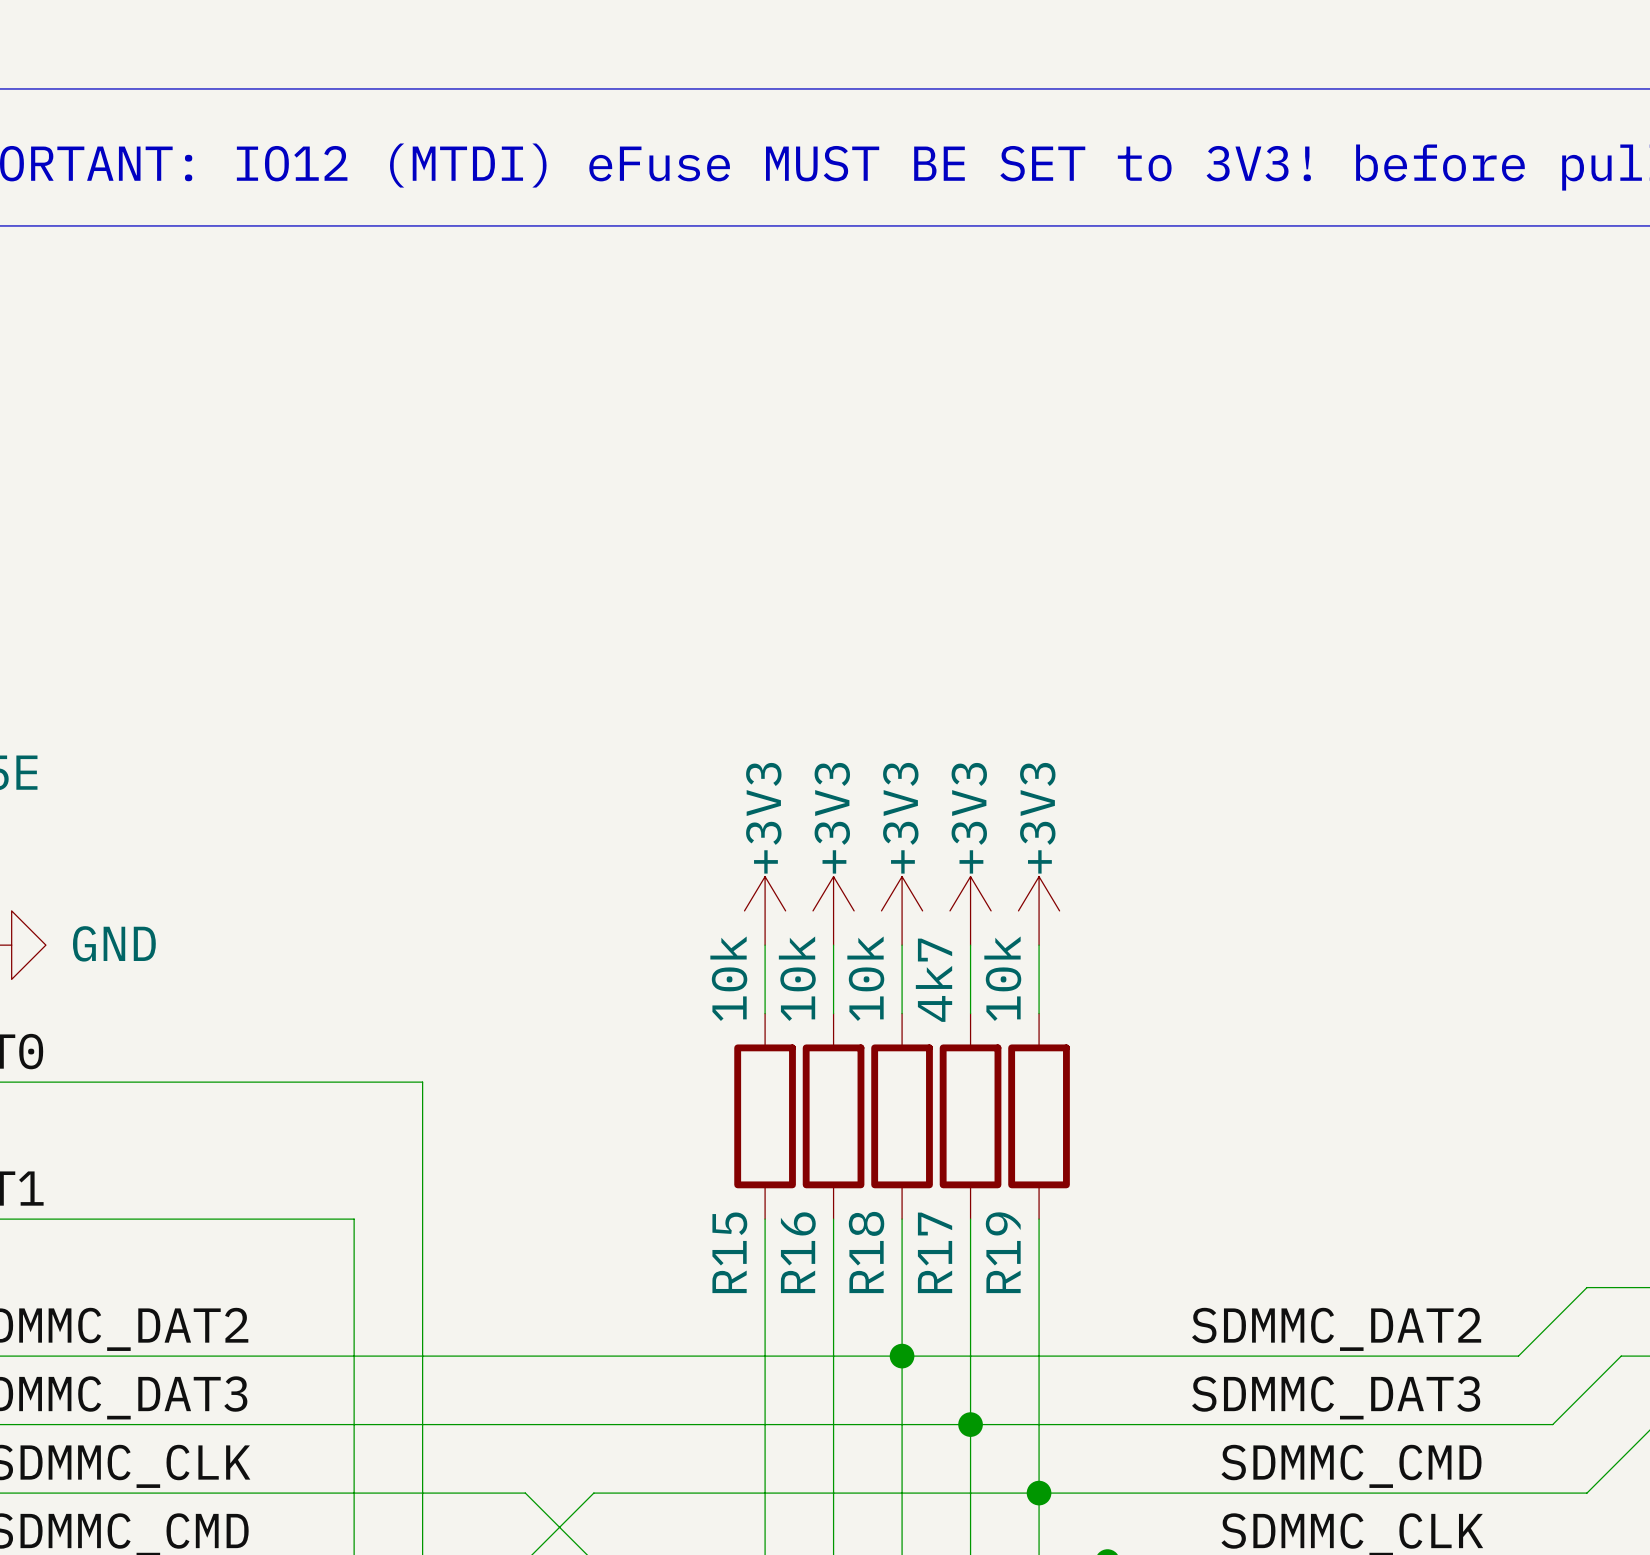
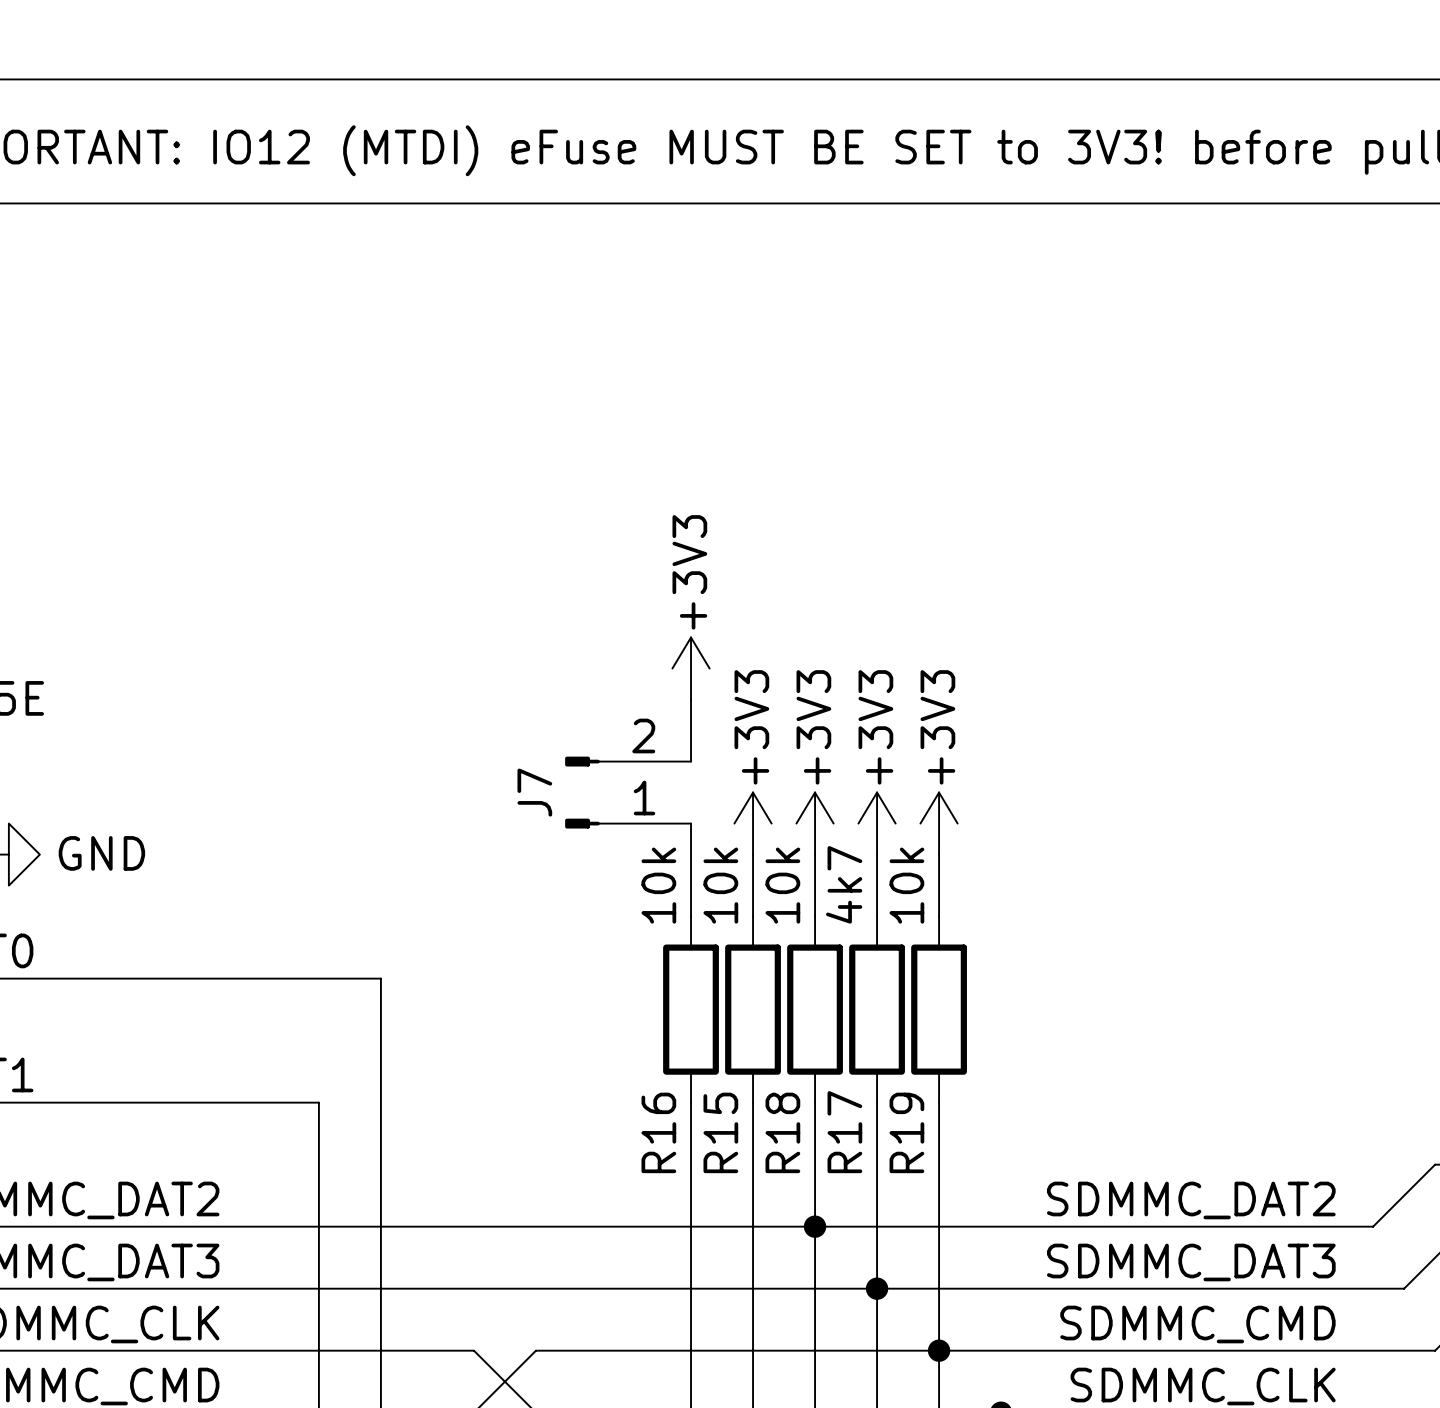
wire: none -> (691, 699) (691, 761)
J7: none -> (628, 792)
power symbol position: +3V3 (765, 910) -> +3V3 (691, 668)
R15 name: R15 (729, 1252) -> R16 (658, 1132)
R16 name: R16 (798, 1252) -> R15 (720, 1132)

